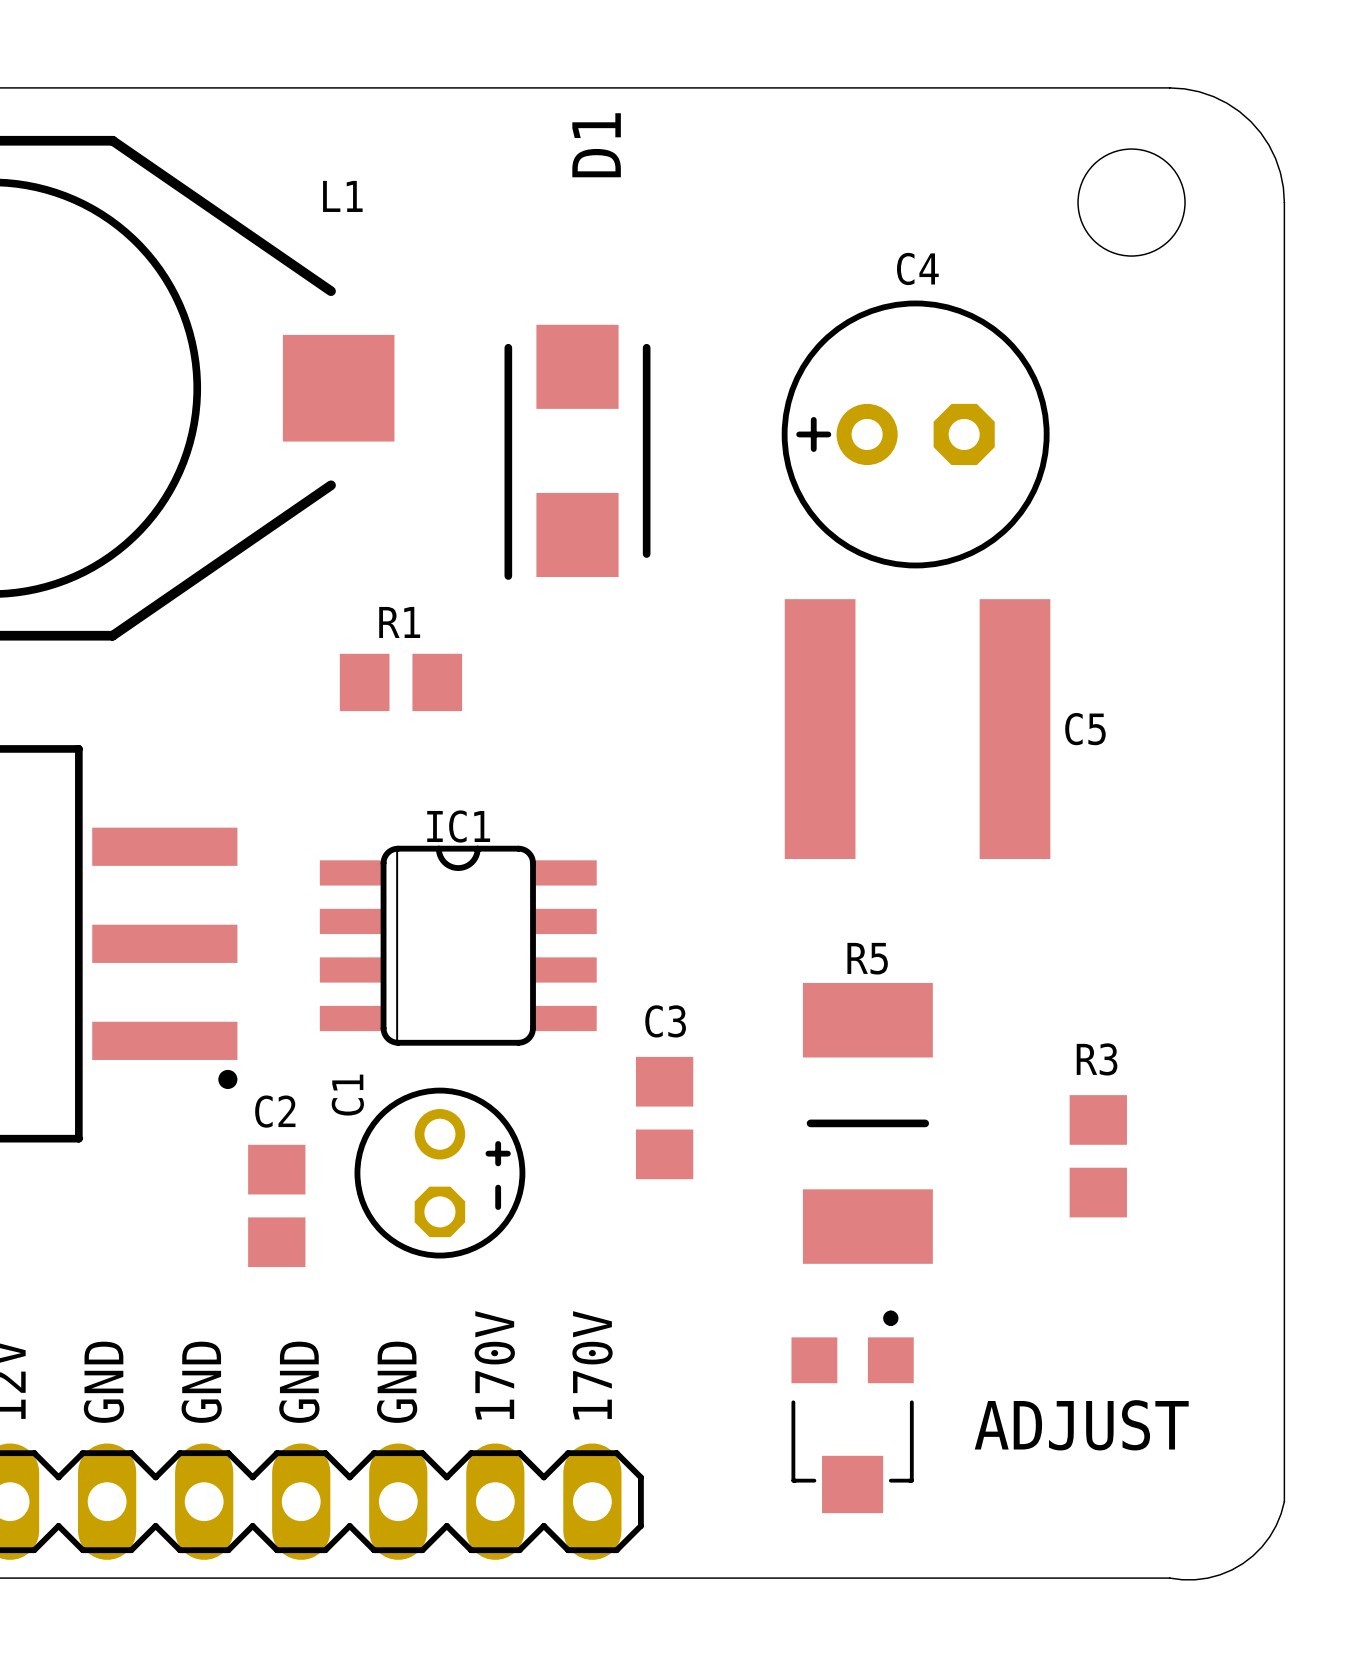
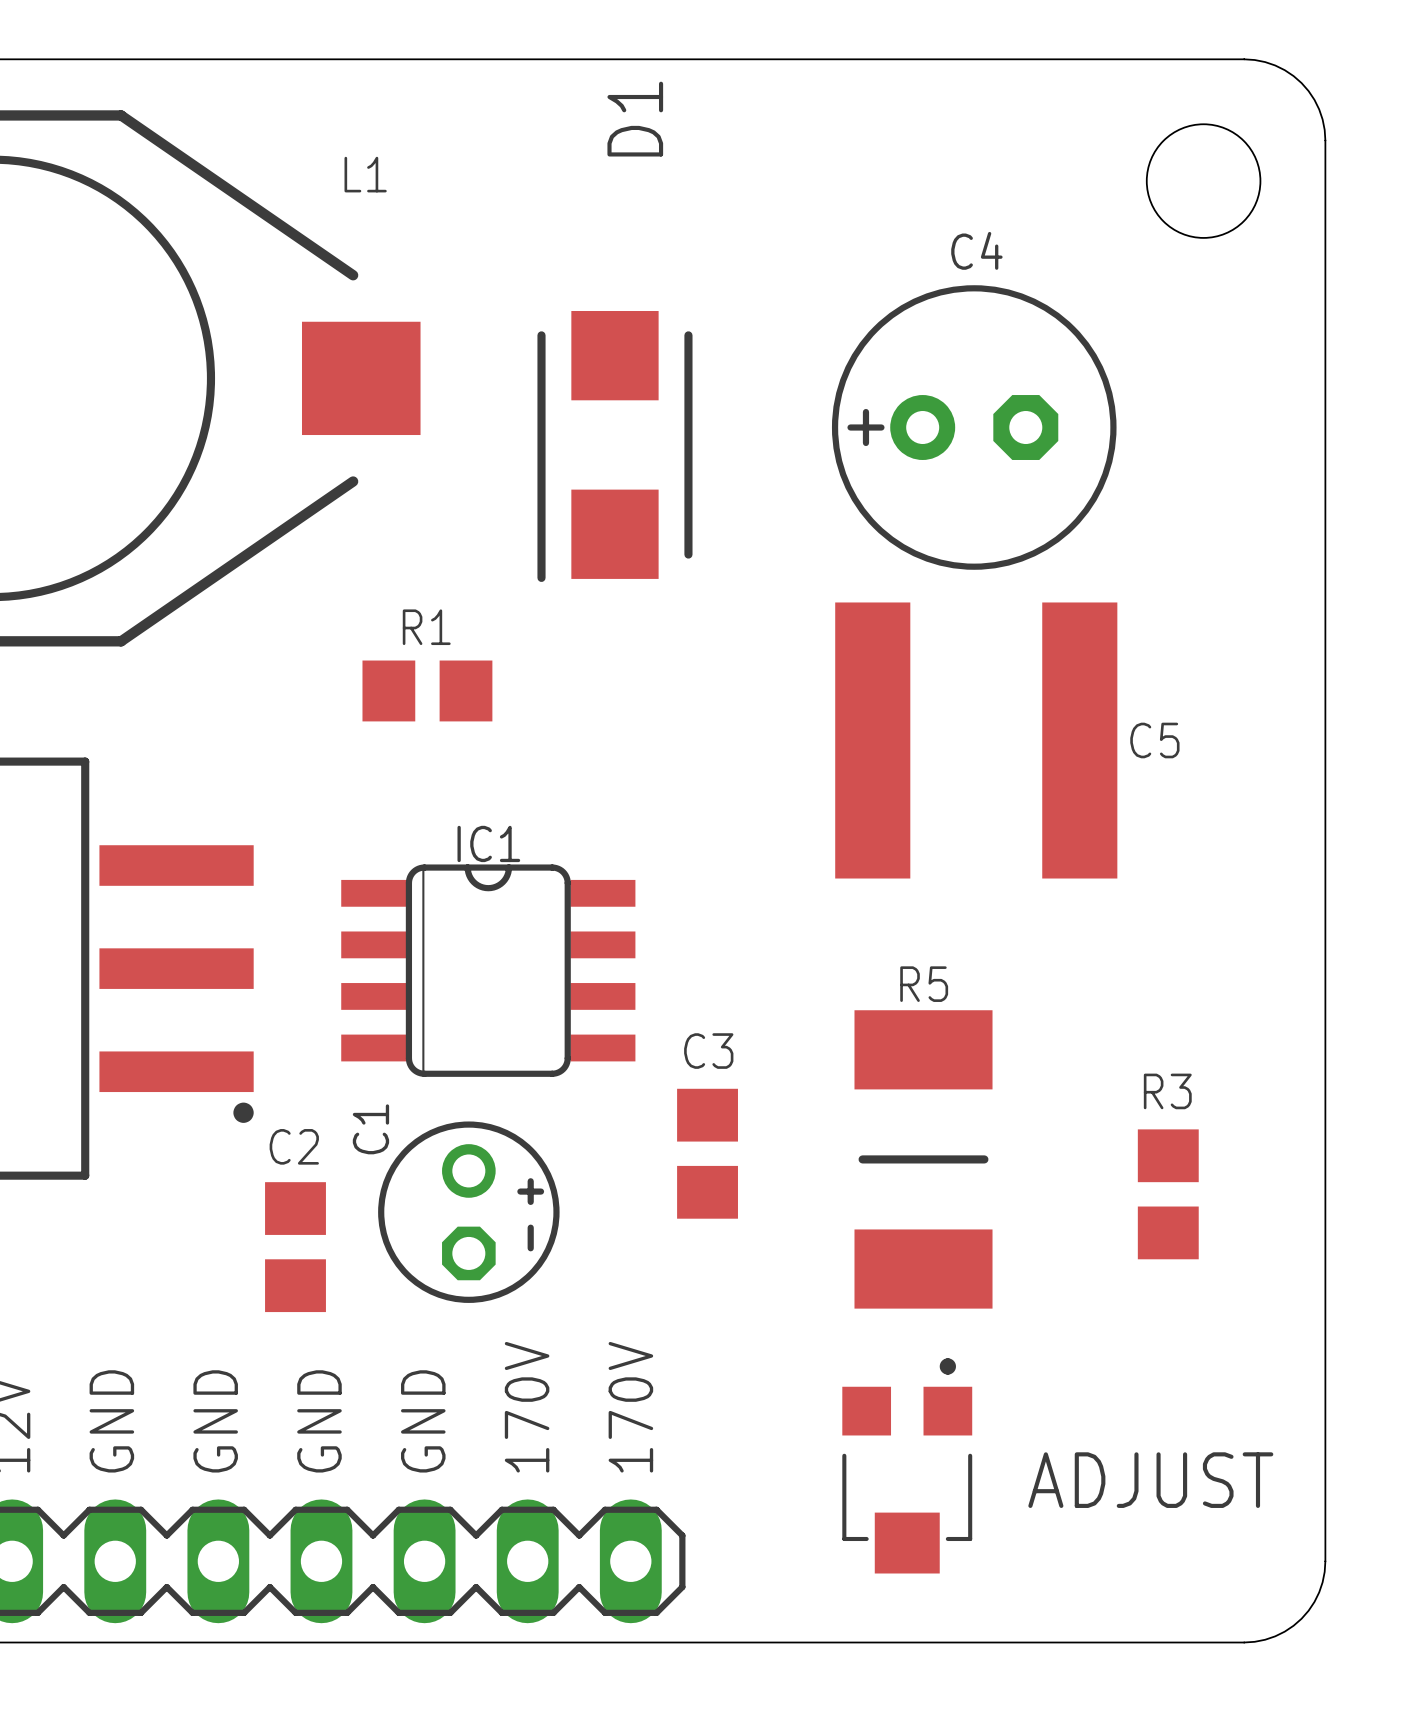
board edge: (1169, 87) (1199, 91) (1213, 96) (1239, 111) (1250, 121) (1260, 132) (1275, 158) (1280, 172) (1284, 202) (1284, 1501) (1276, 1525) (1269, 1536) (1253, 1555) (1242, 1563) (1220, 1574) (1207, 1578) (1182, 1579) (1169, 1578) -> (1244, 59) (1275, 65) (1301, 83) (1319, 109) (1325, 140) (1325, 1561) (1319, 1592) (1301, 1618) (1275, 1636) (1244, 1642)

